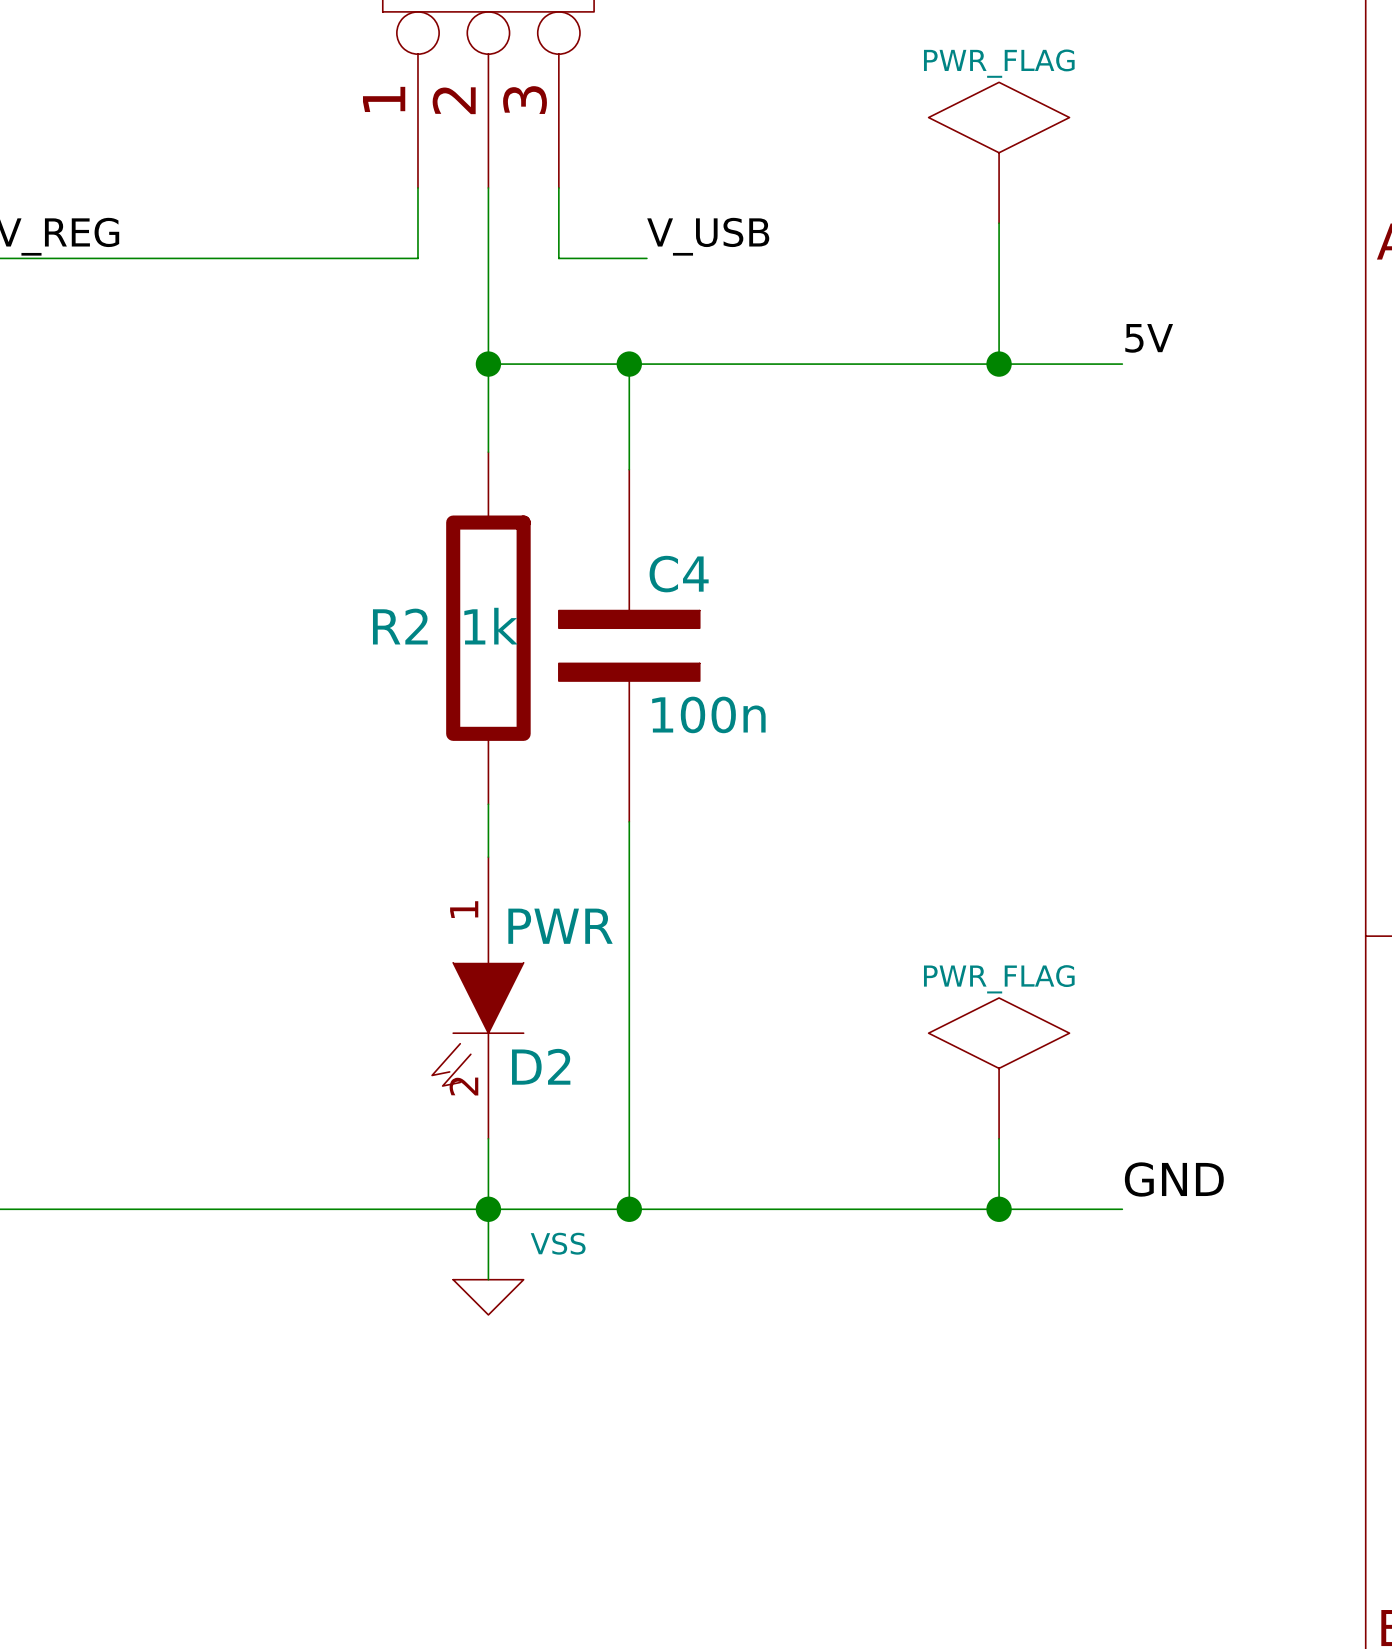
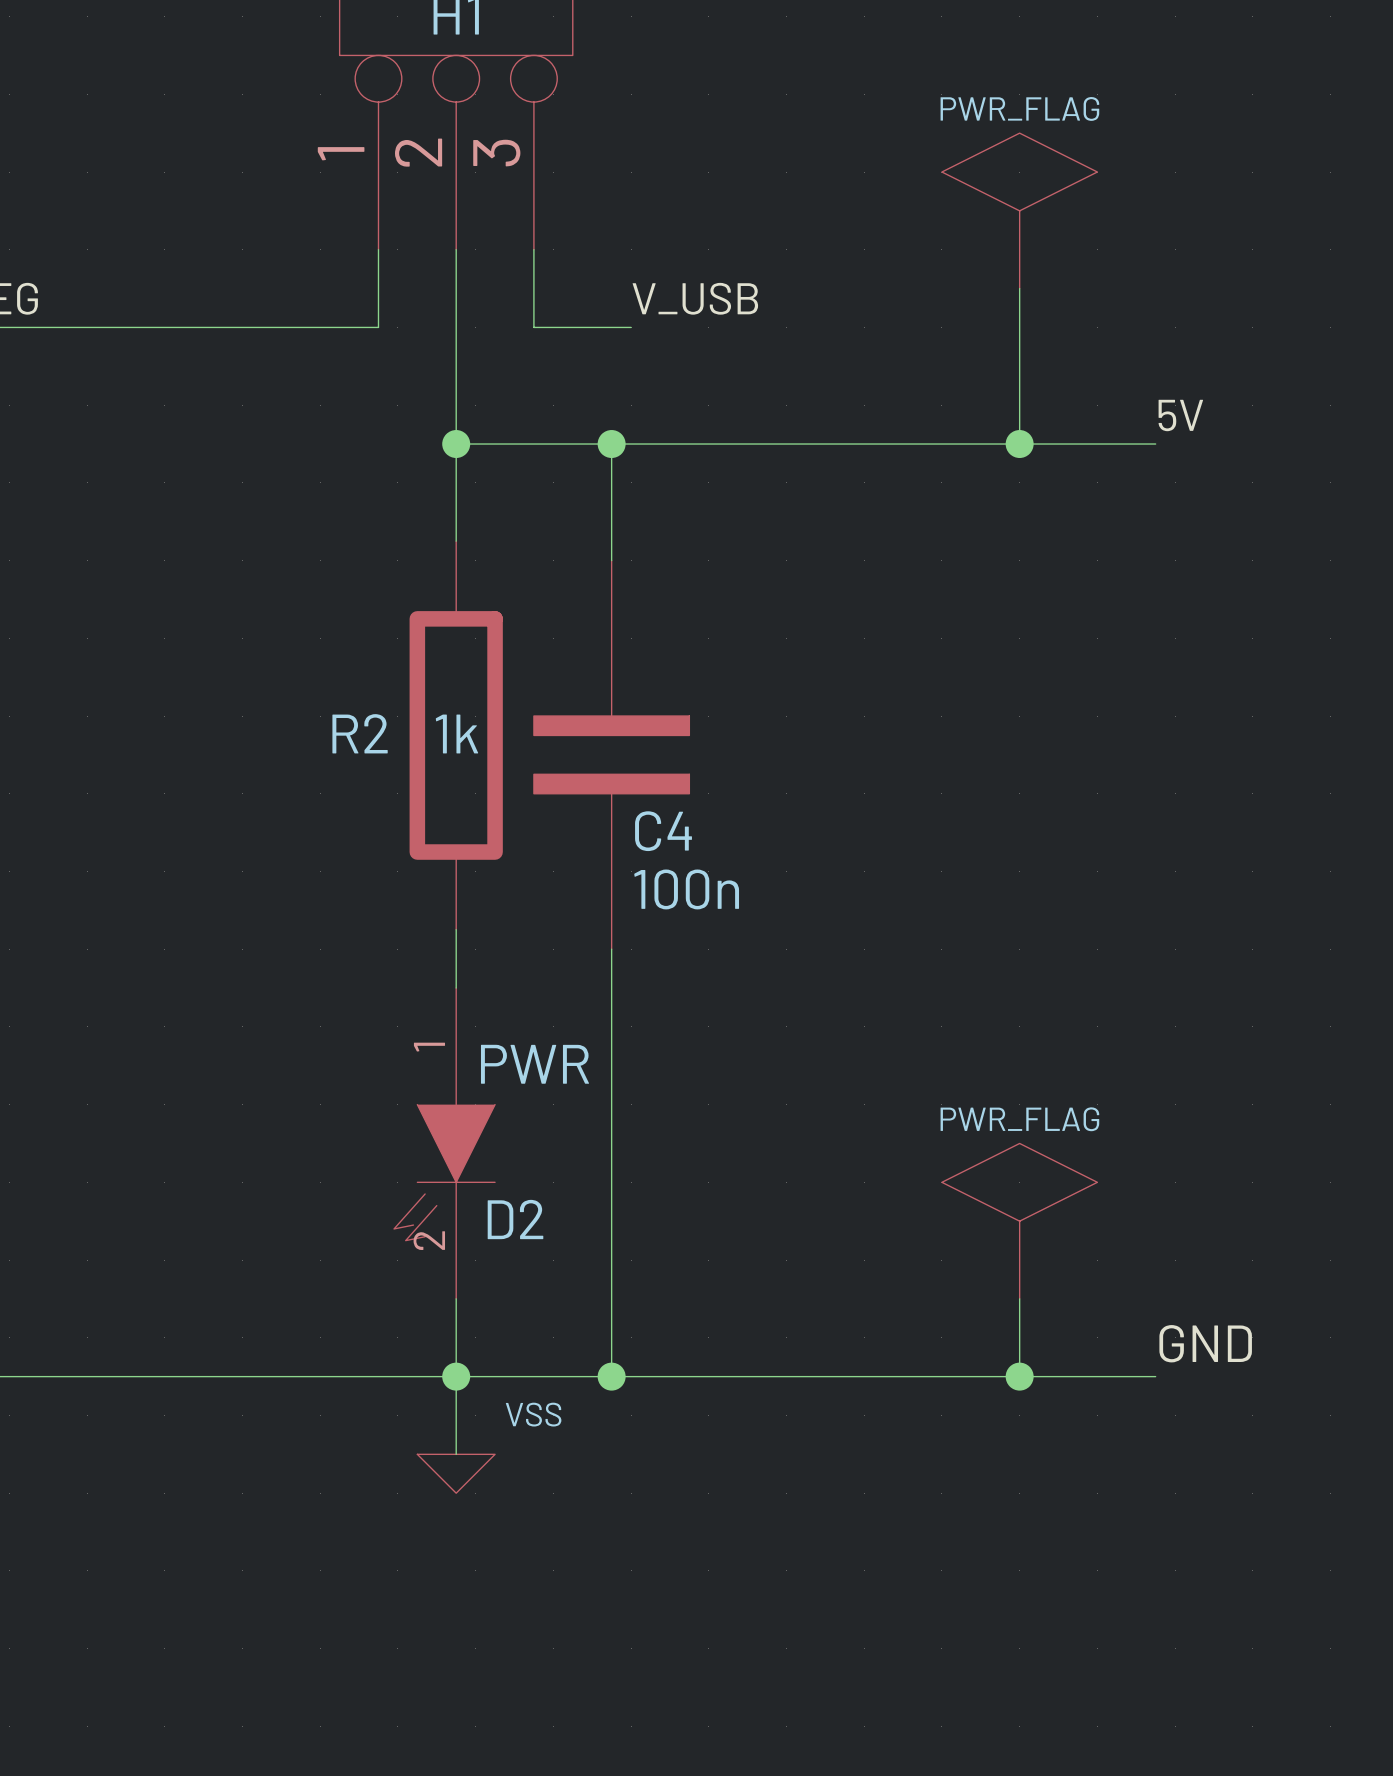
C4 name position: C4 (679, 574) -> C4 (663, 831)
C4 value position: 100n (708, 714) -> 100n (686, 889)

